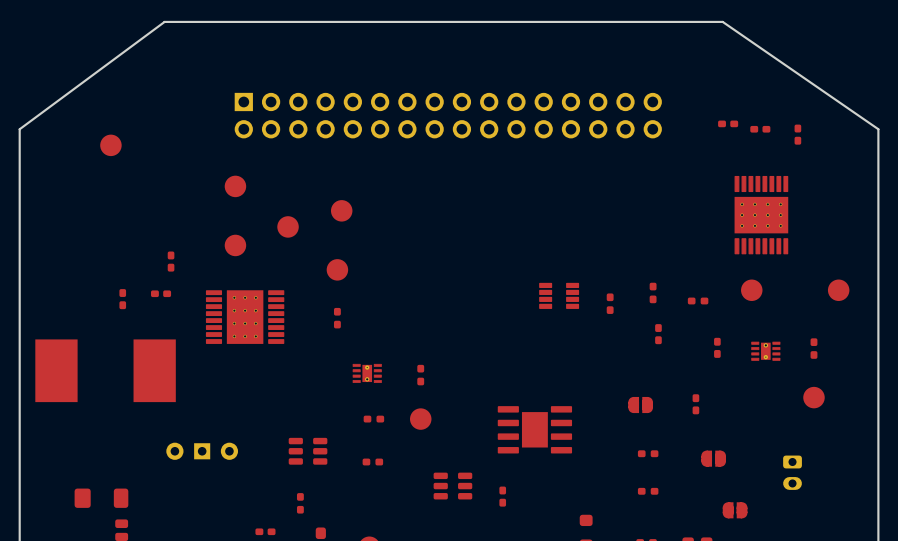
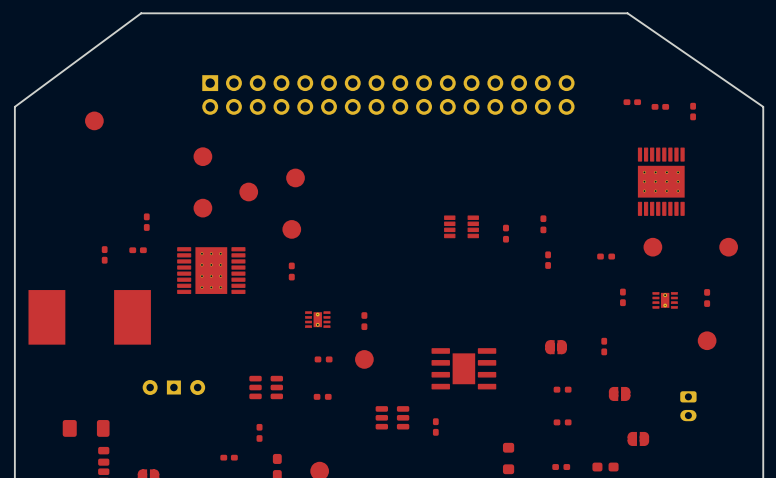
part: none -> (543, 224)
part: none -> (505, 233)
part: (653, 292) -> none
part position: (559, 295) -> (461, 226)
part: (610, 303) -> none
part position: (658, 334) -> (548, 260)

